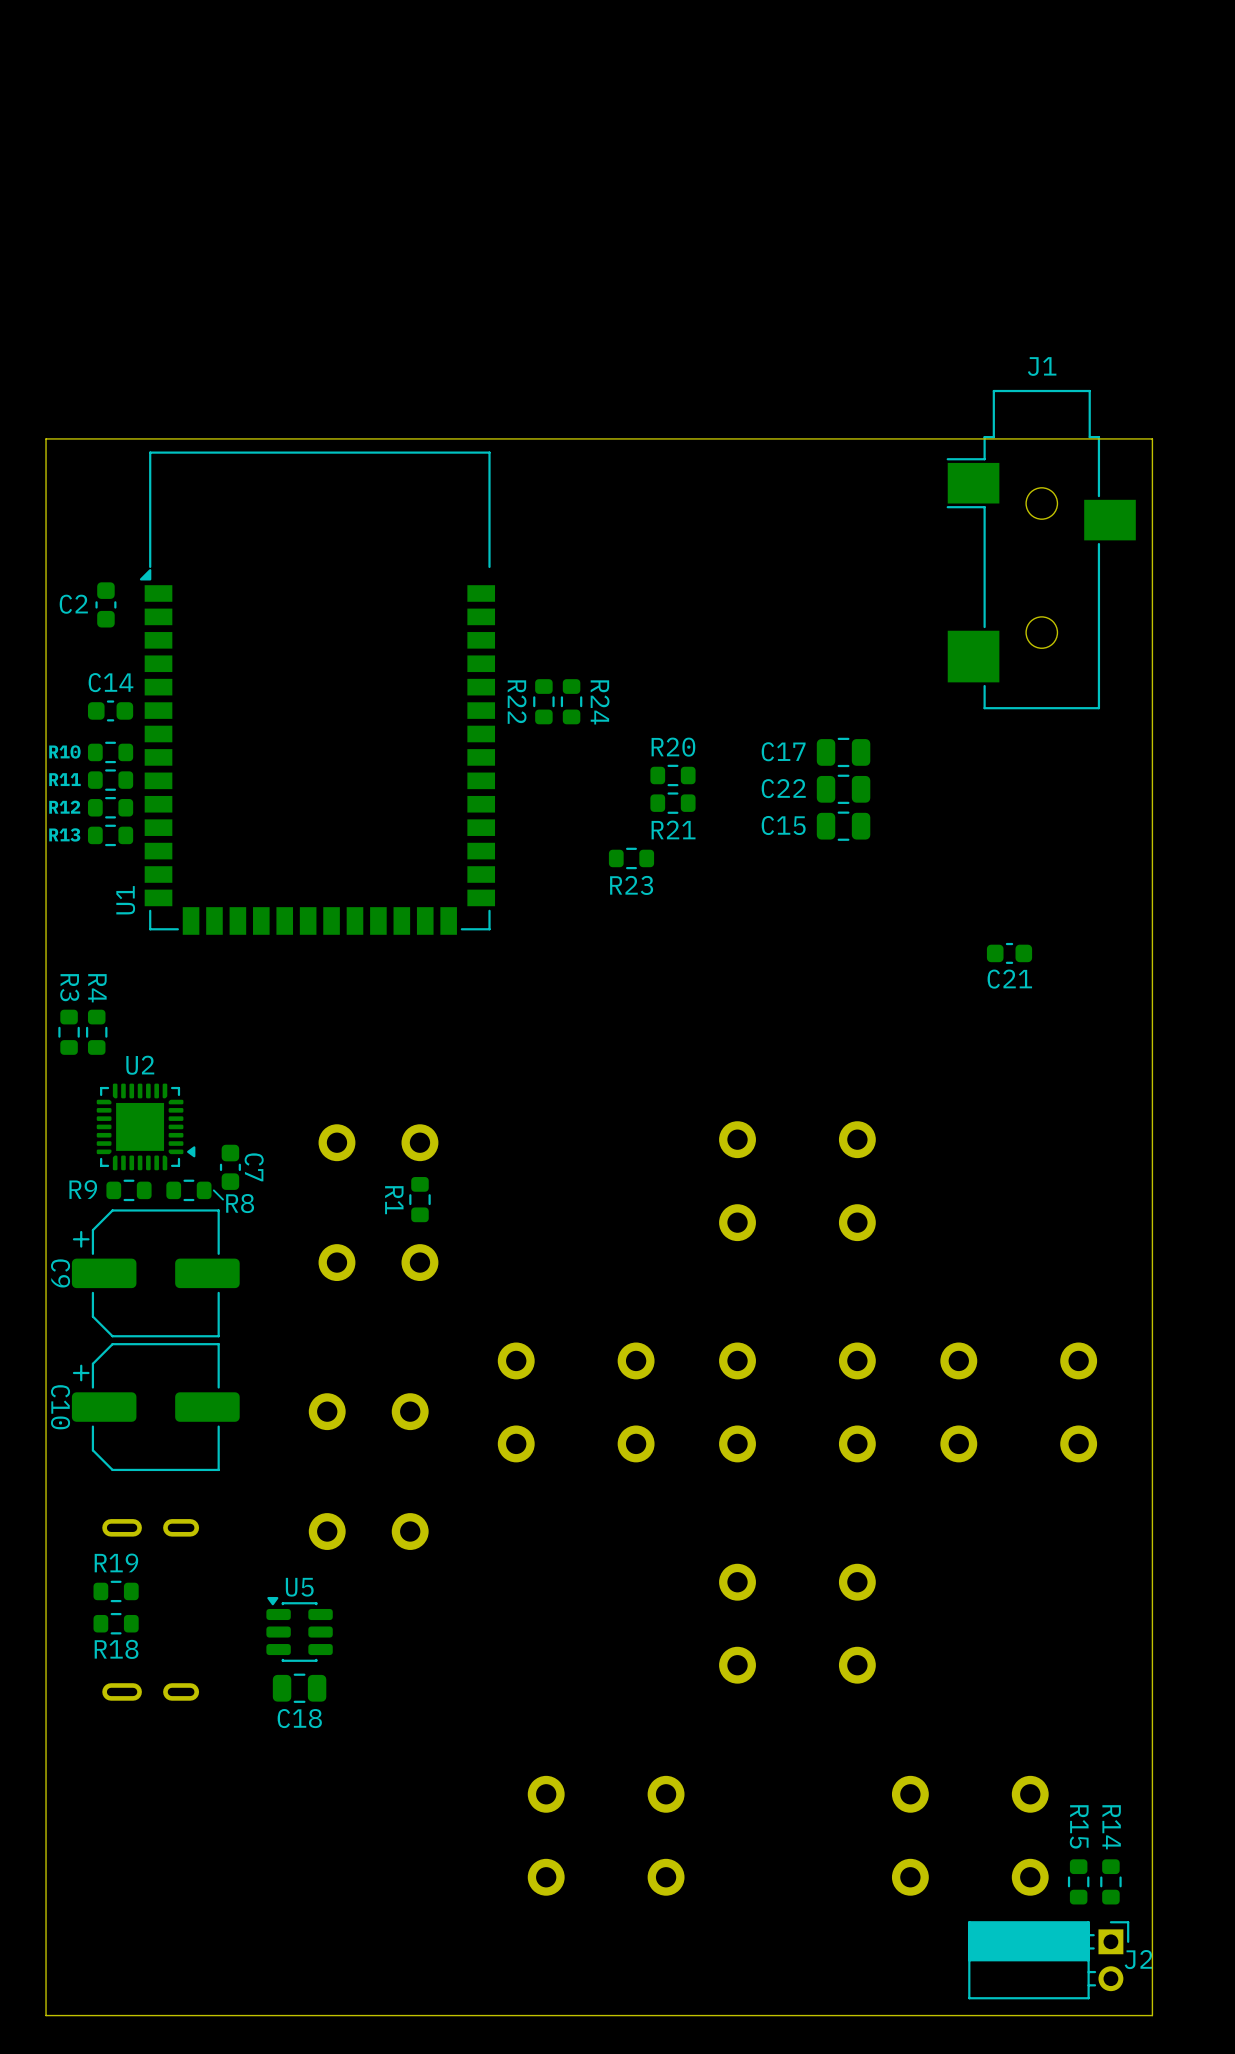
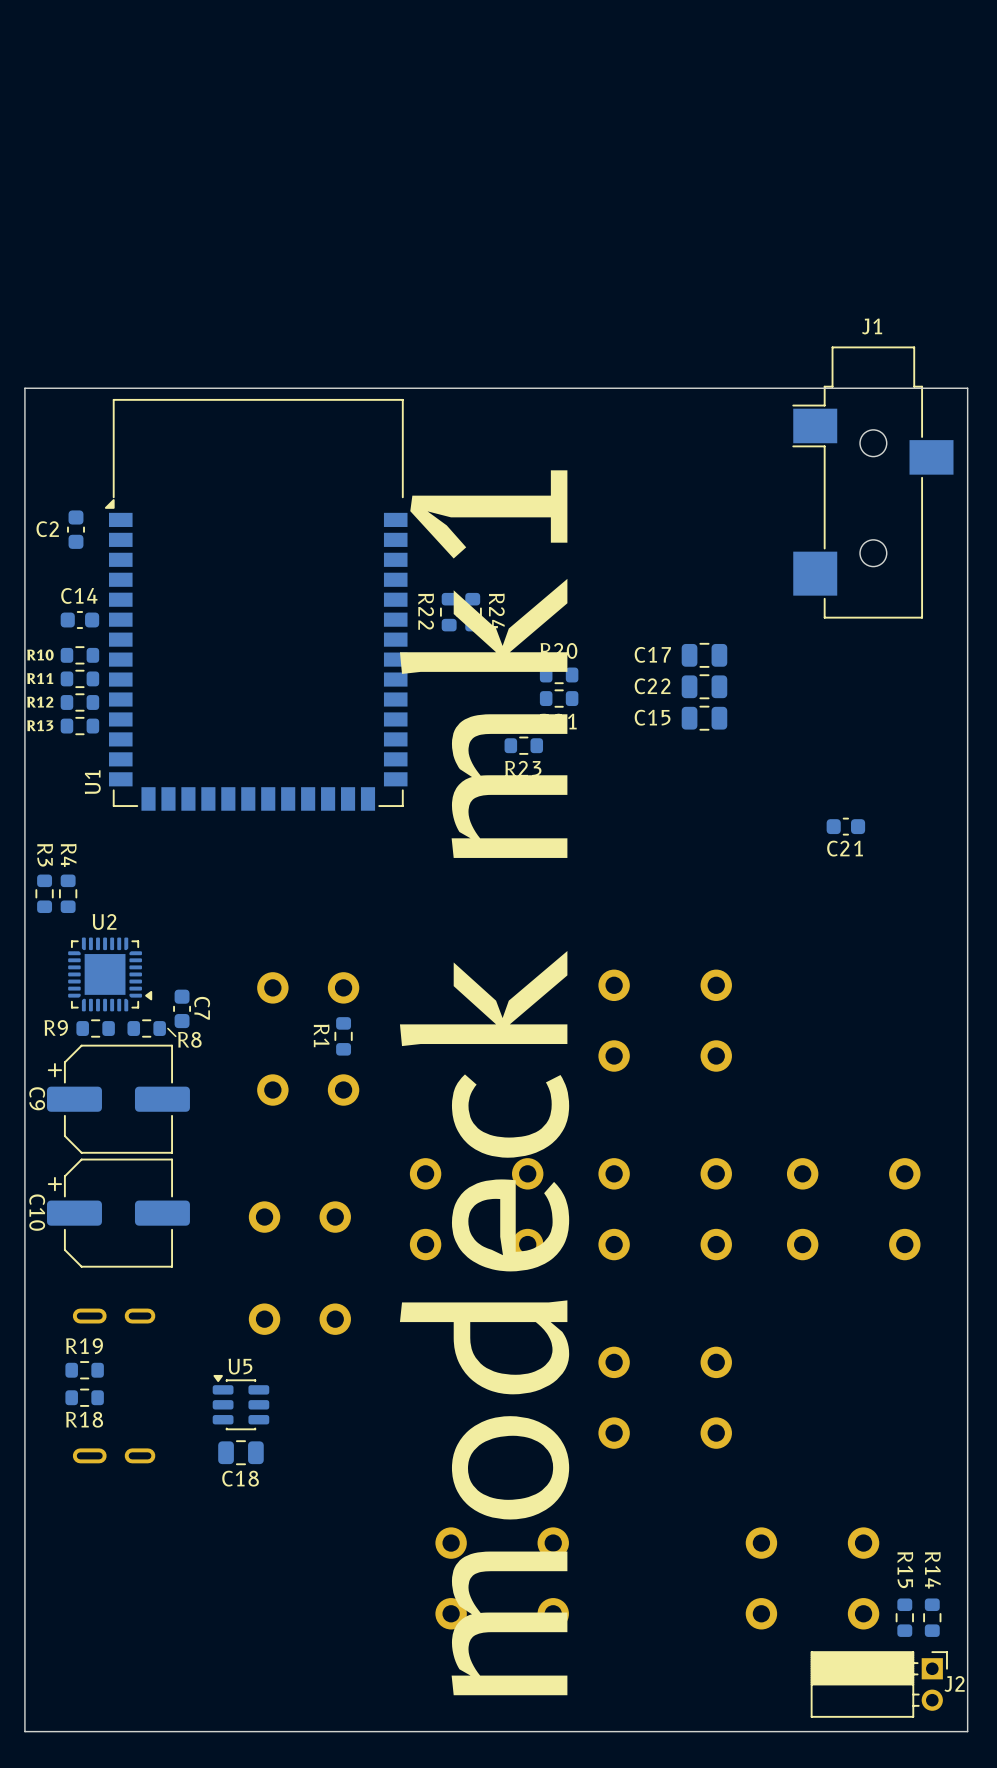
text: none -> modeck mk1 (484, 1082)

